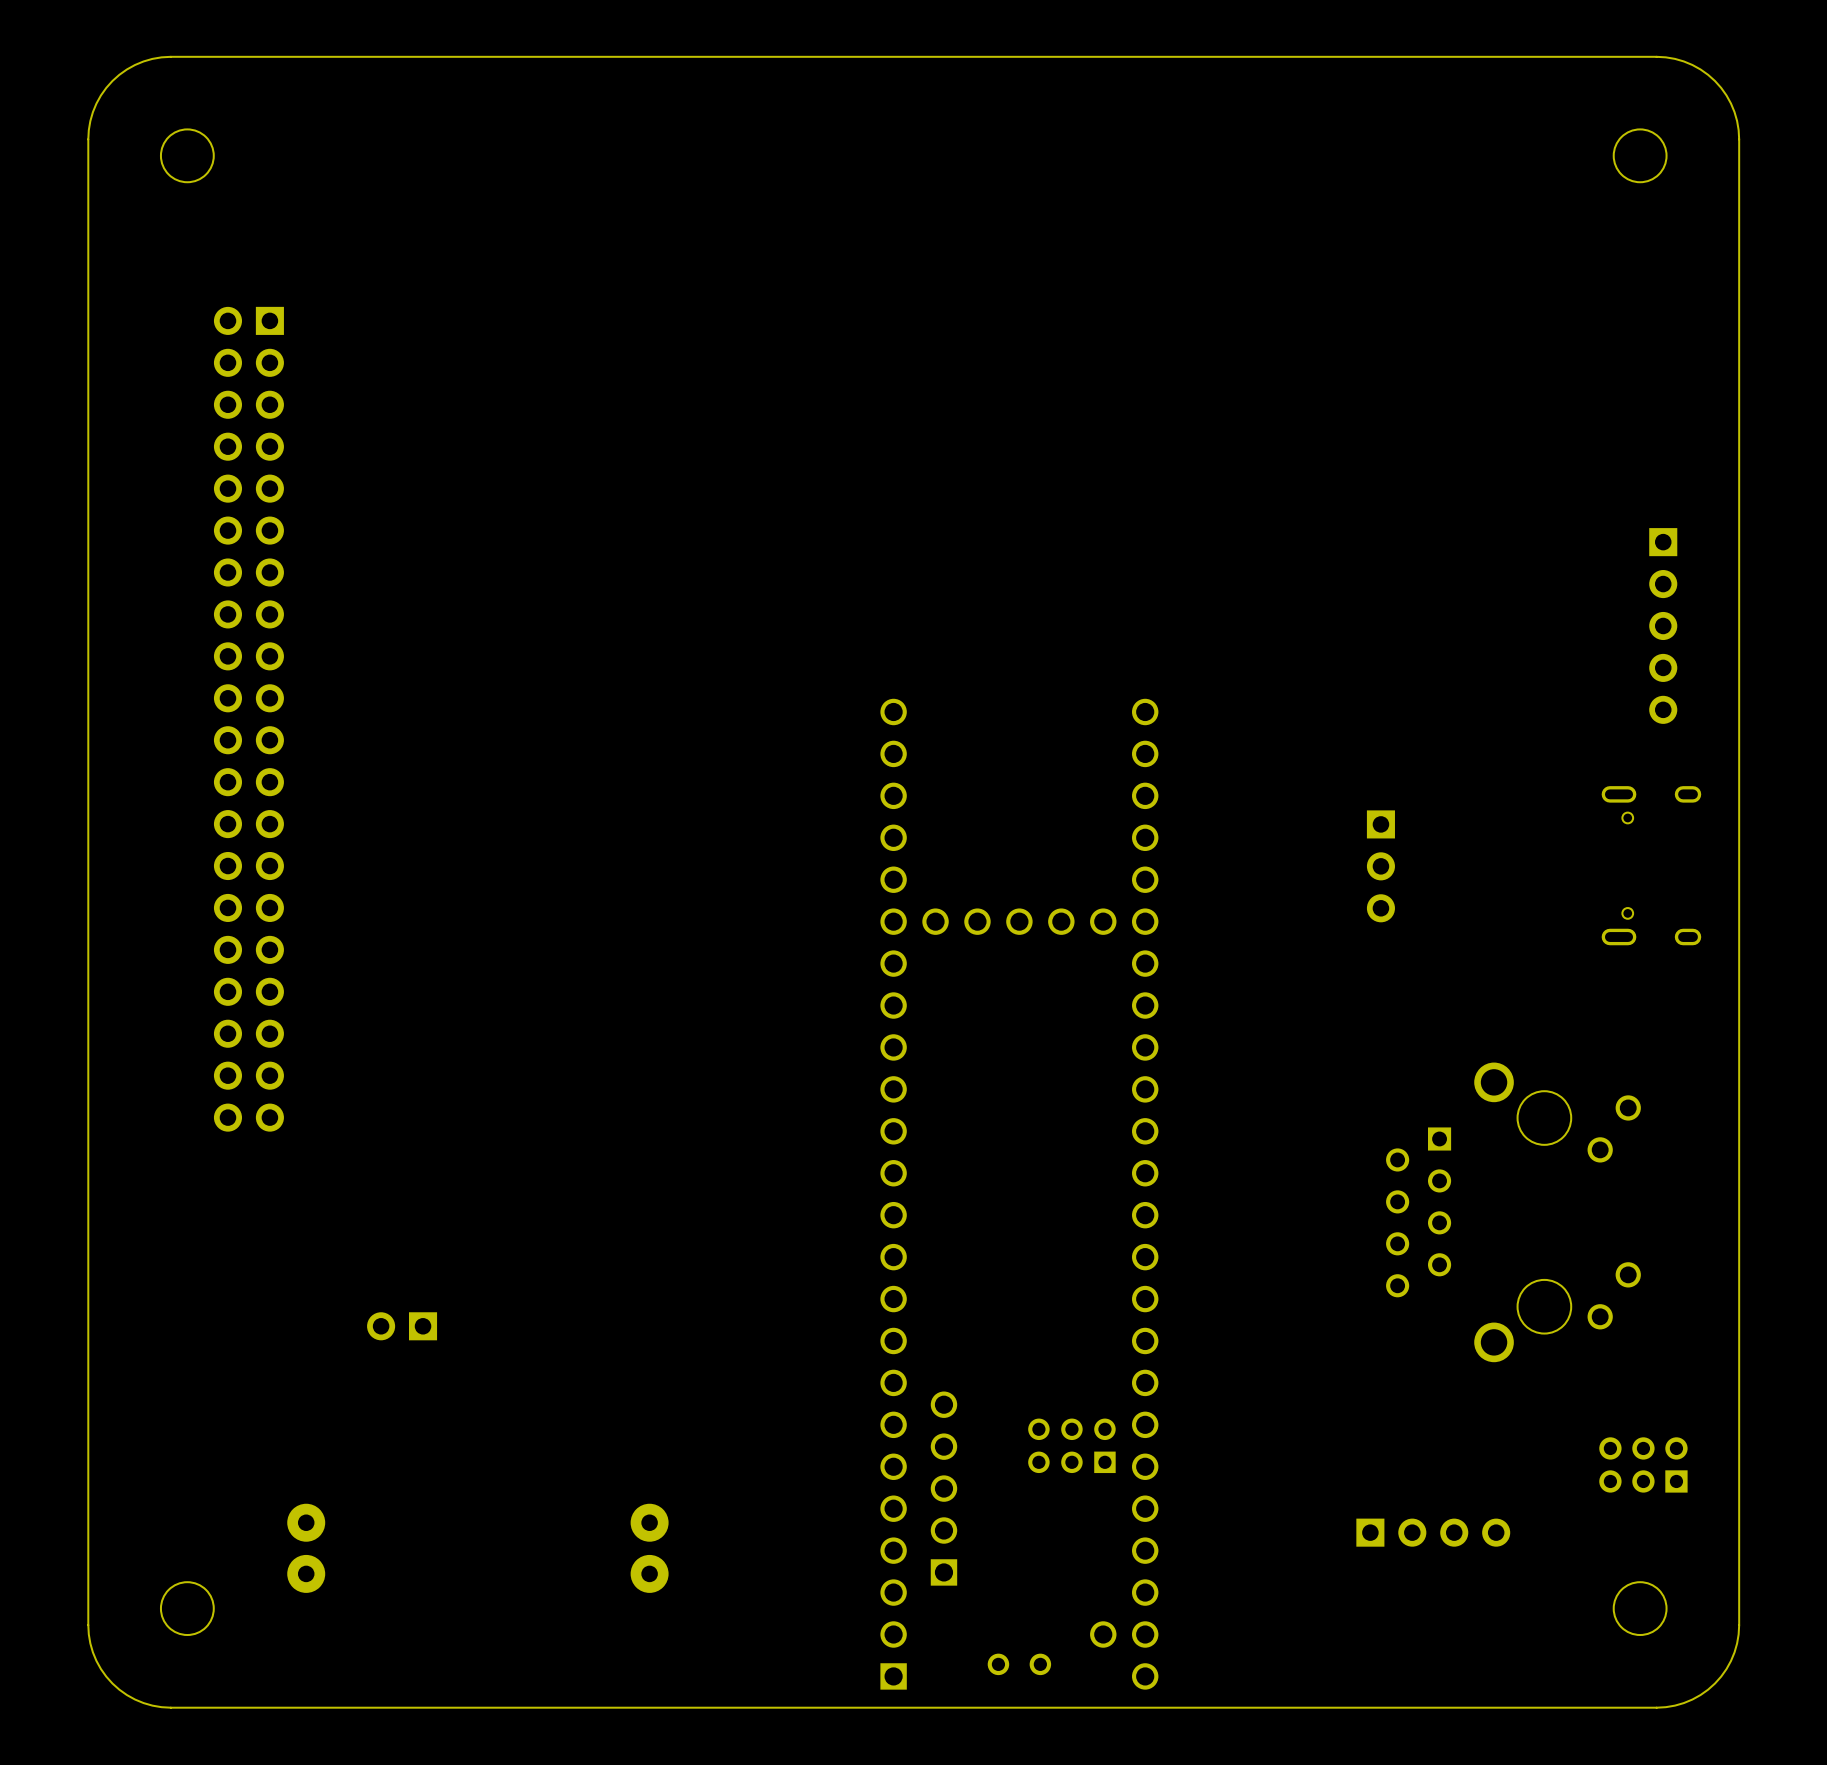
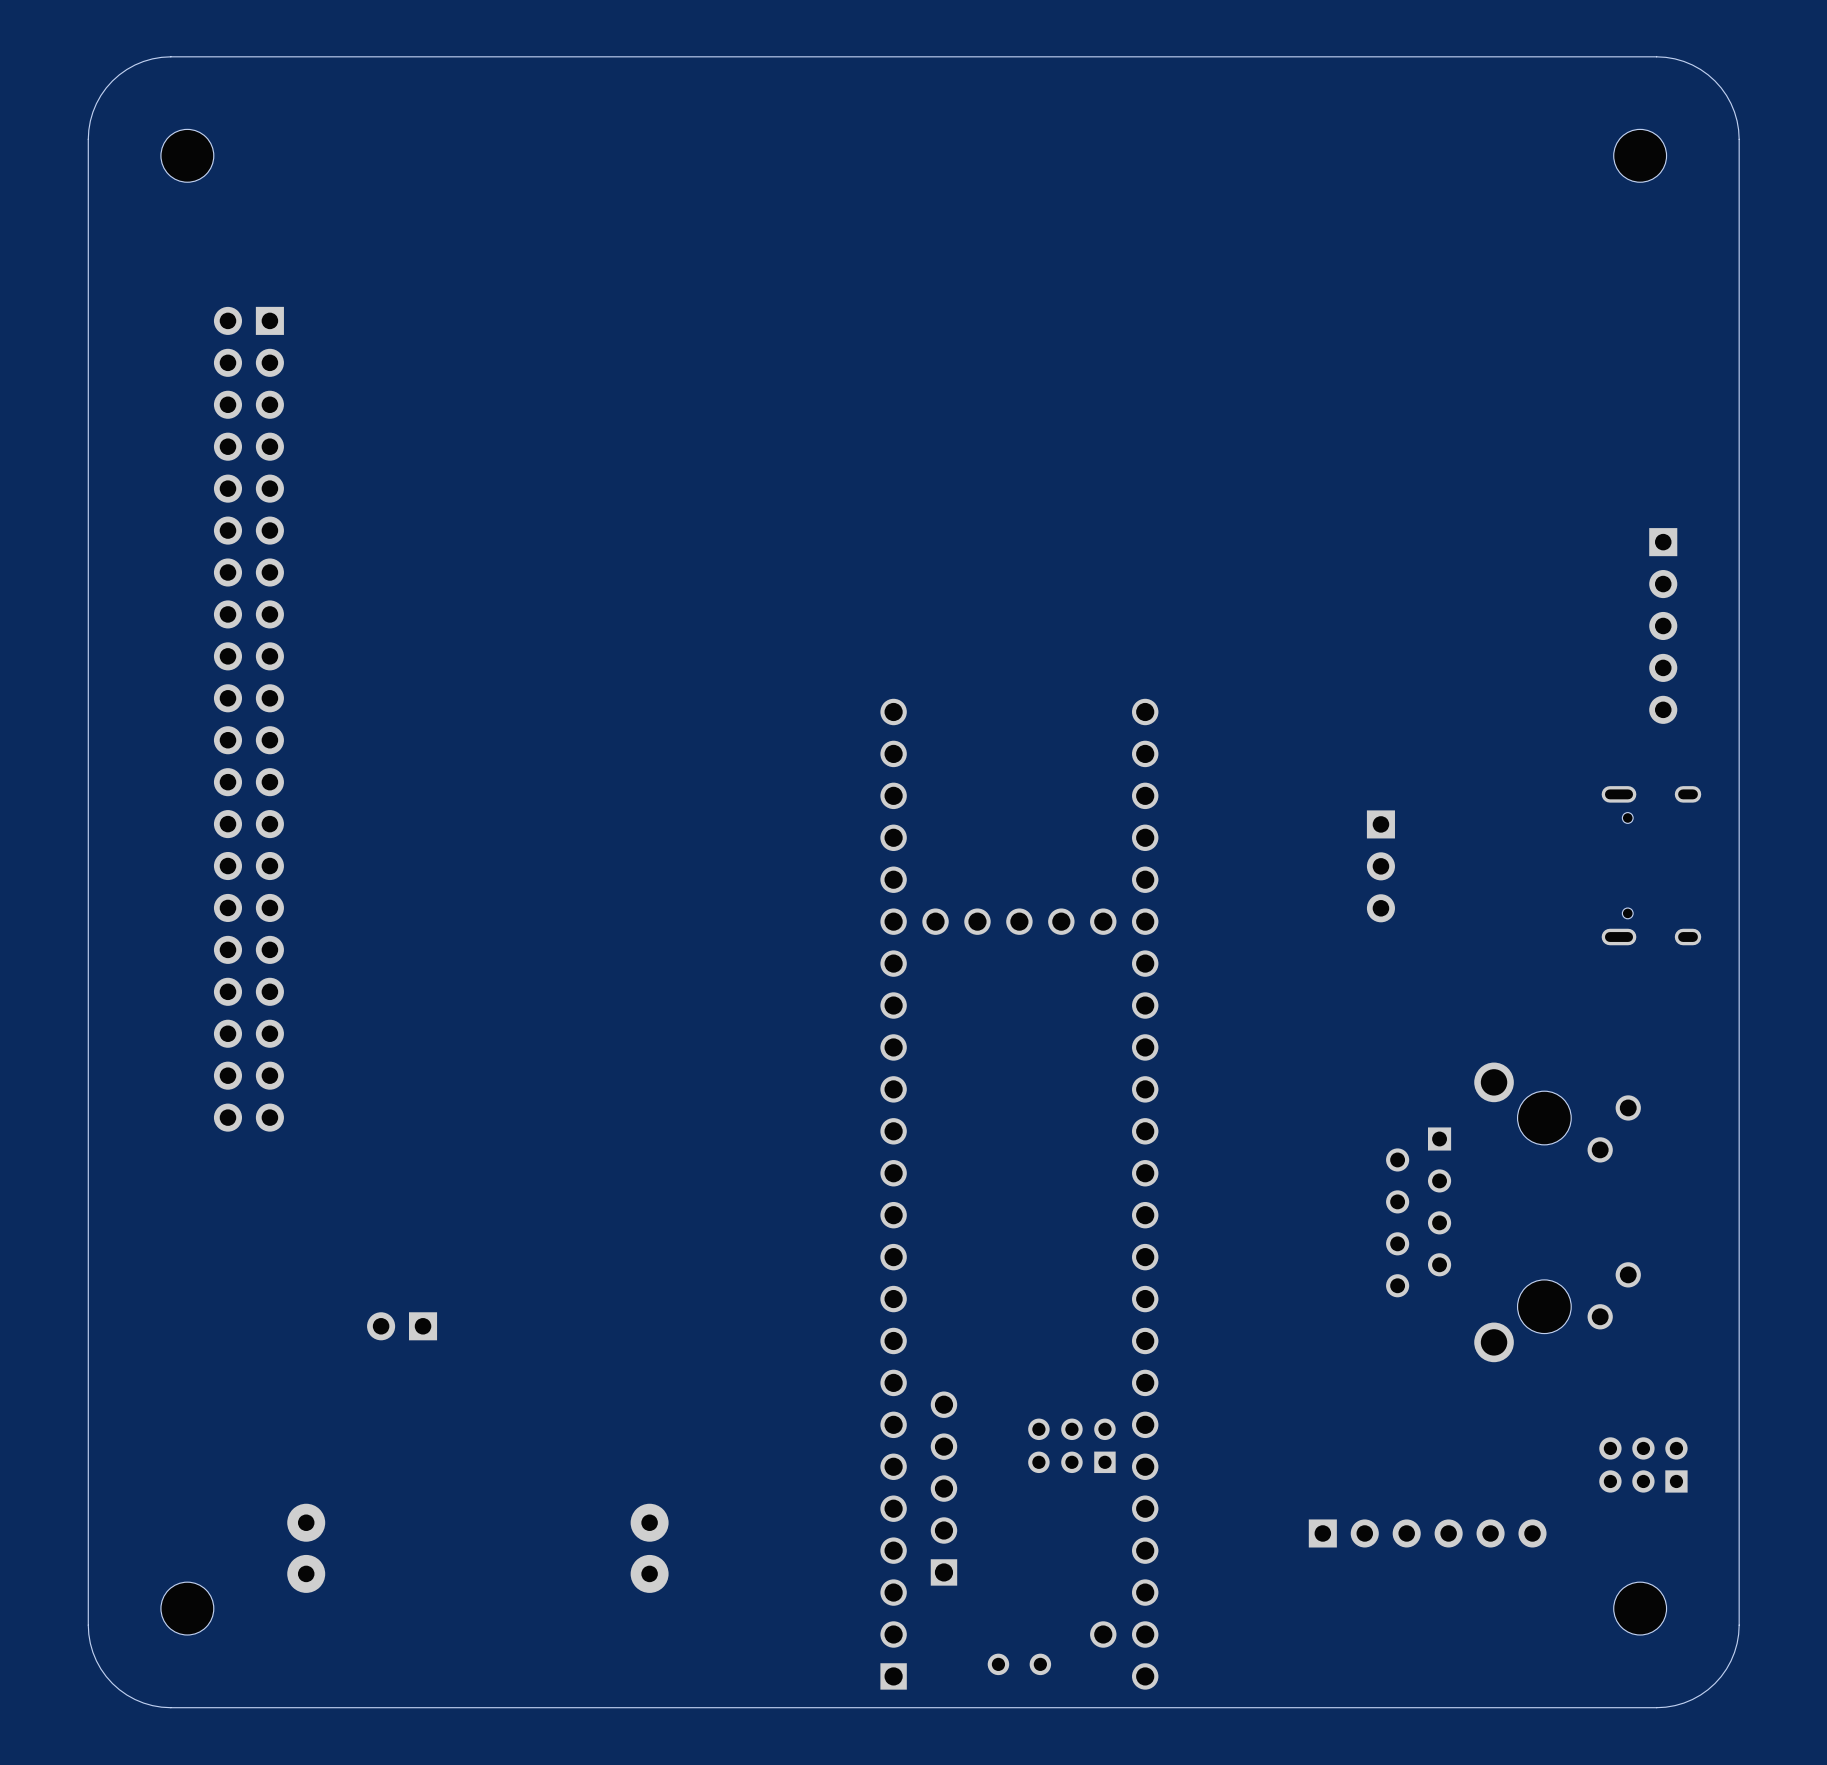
part footprint: [1356, 1518, 1511, 1547] -> [1308, 1519, 1547, 1548]

